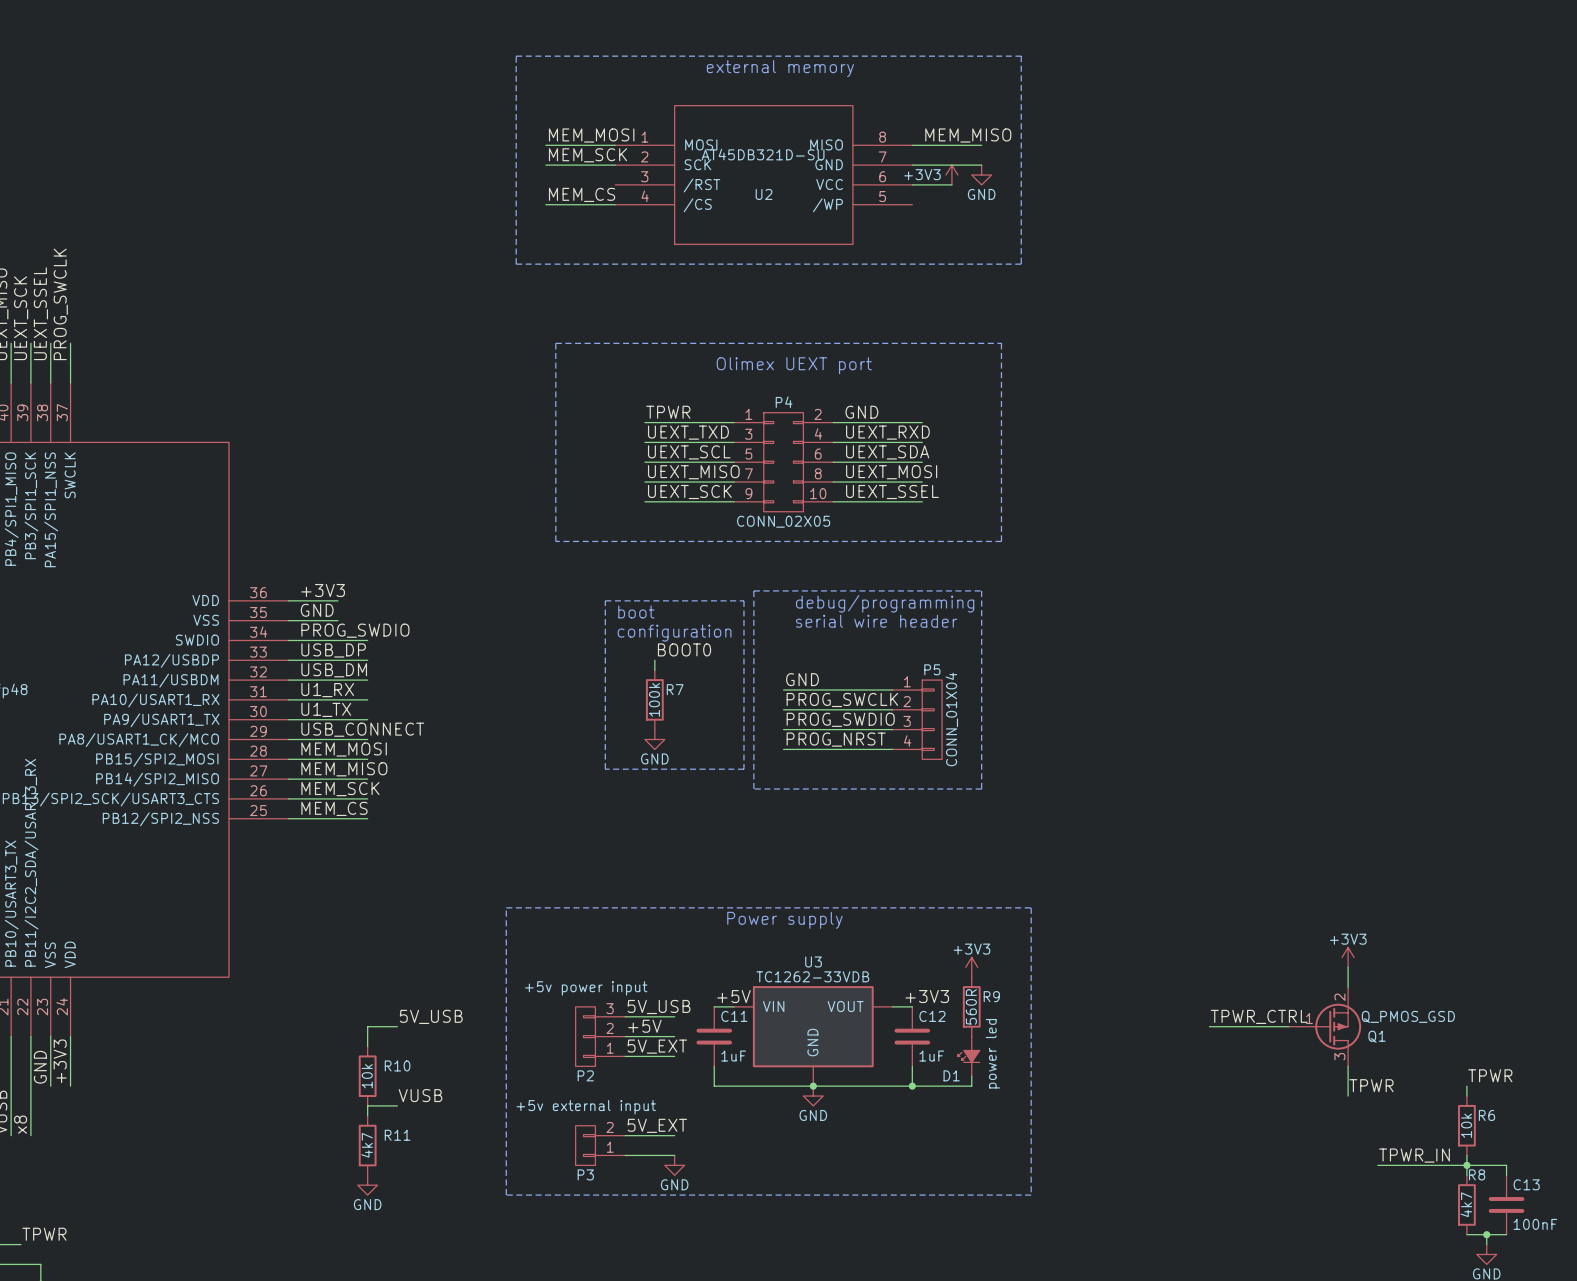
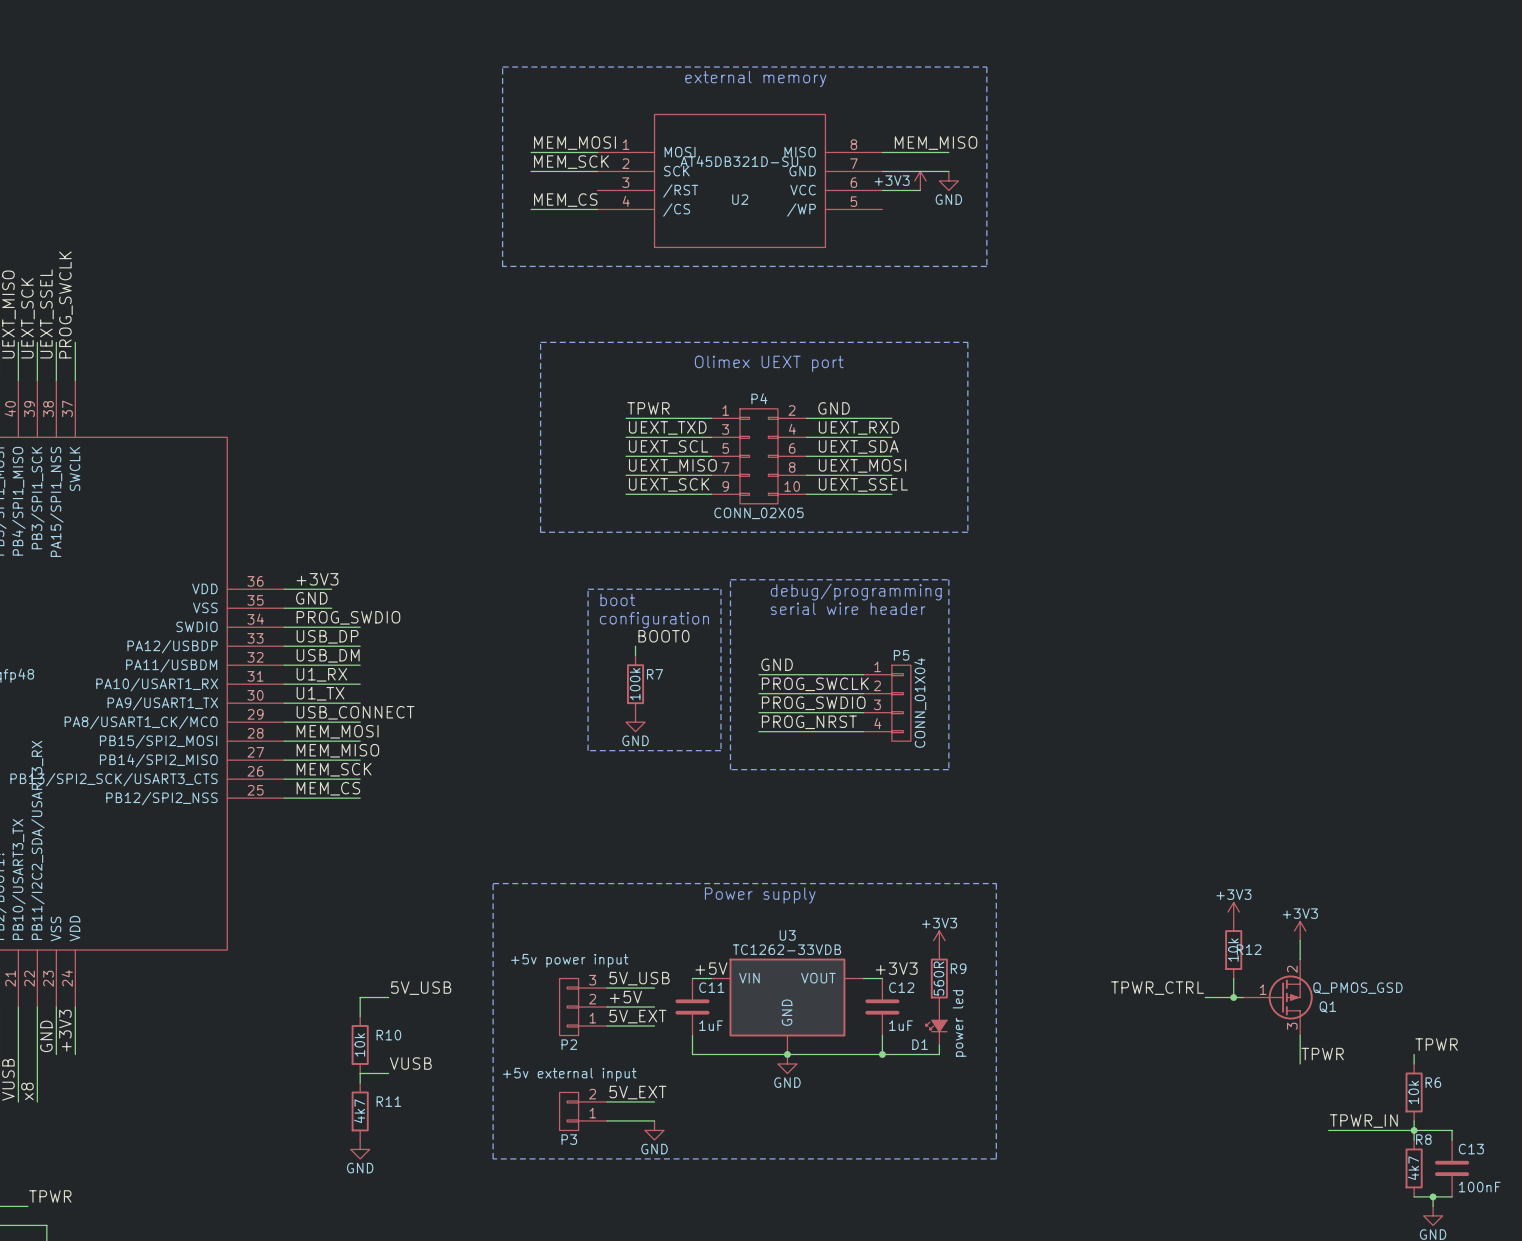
power symbol: none -> +3V3 (1233, 912)
R12: none -> 10k (1233, 950)
wire: none -> (1233, 978) (1233, 997)
label position: TPWR_CTRL (1259, 1016) -> TPWR_CTRL (1157, 988)
wire: (1209, 1026) (1249, 1026) -> none
junction: none -> (1233, 997)

